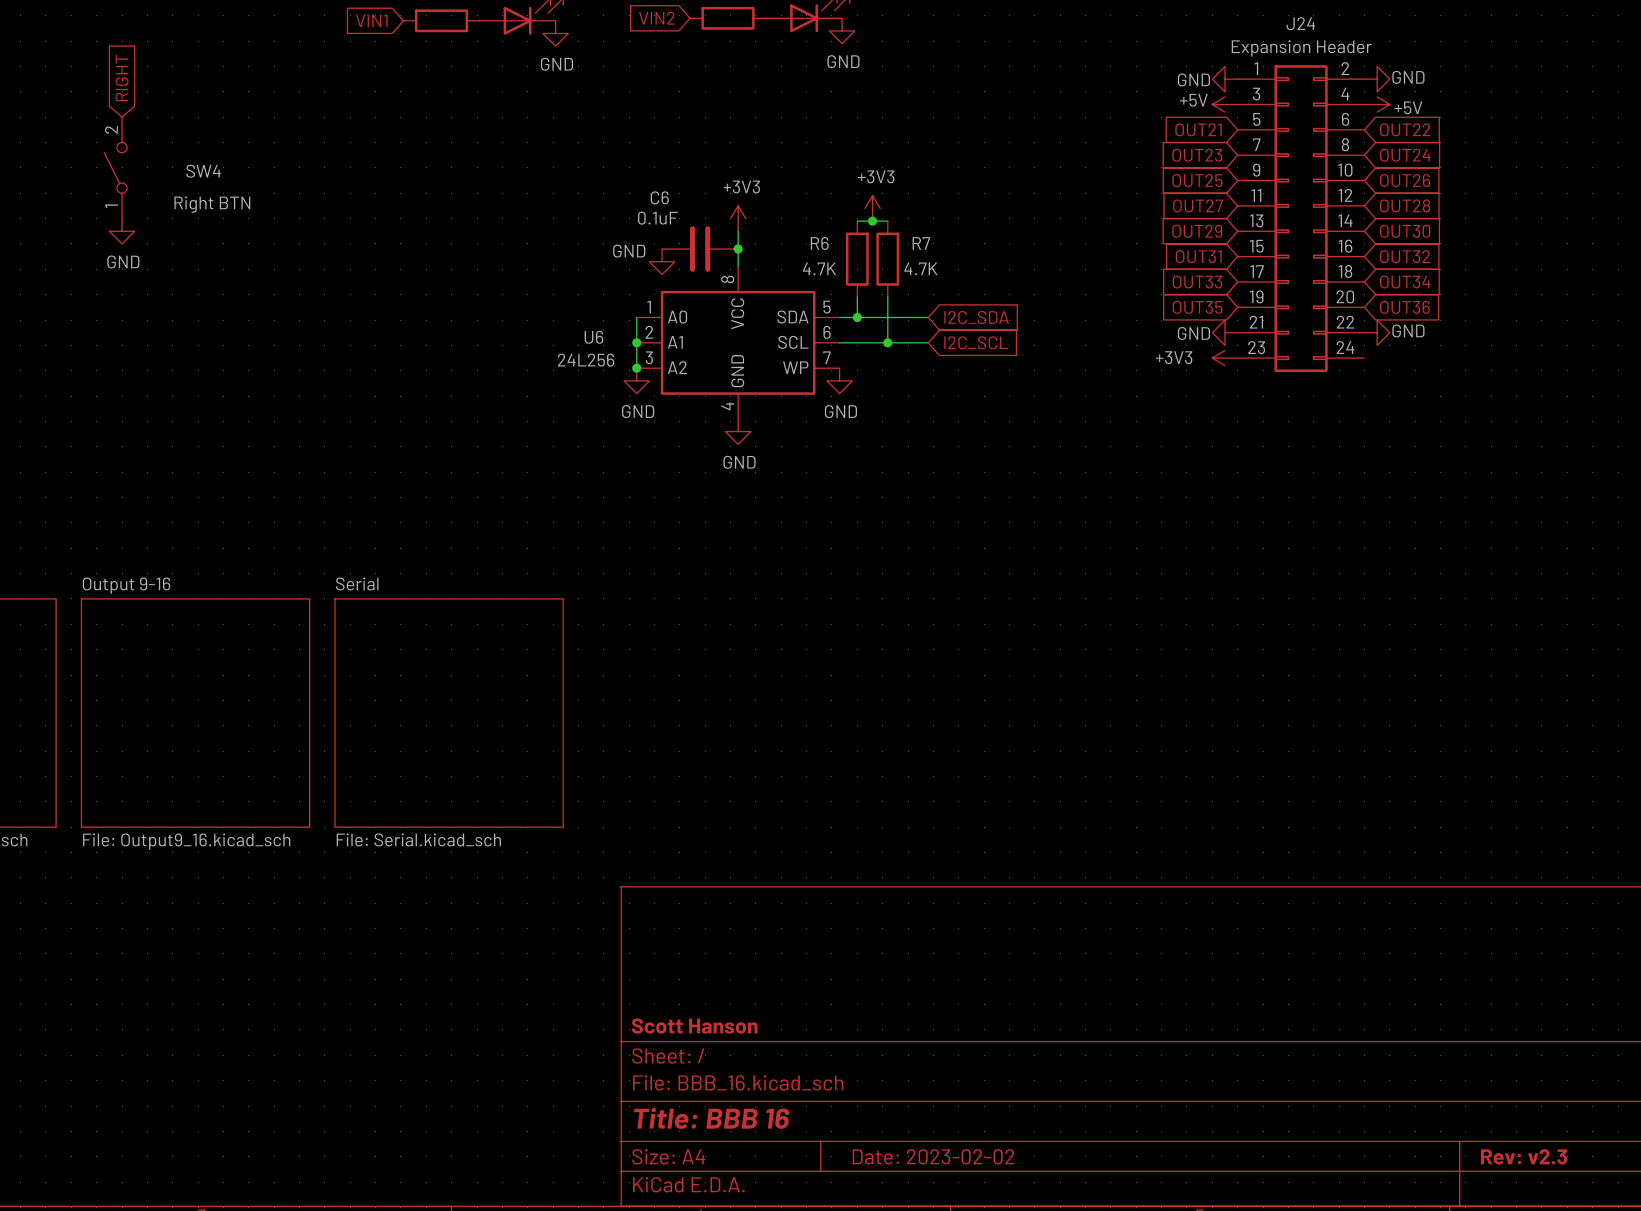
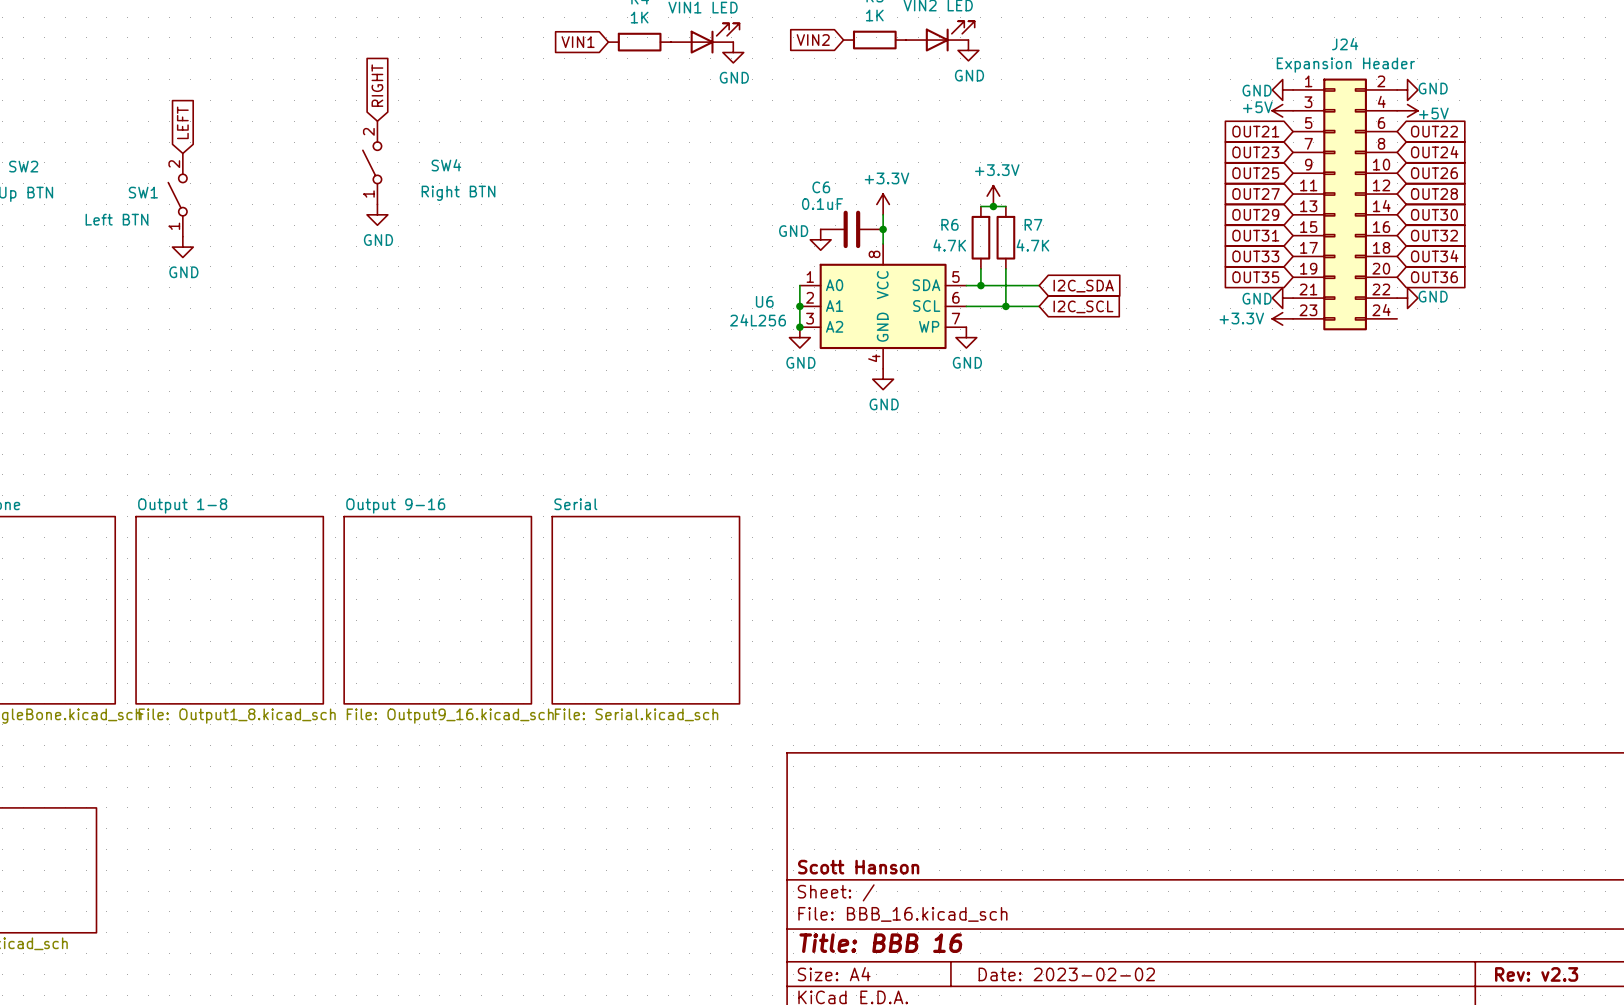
power symbol: +3V3 (872, 208) -> +3.3V (993, 196)
power symbol: +3V3 (738, 218) -> +3.3V (883, 204)
power symbol: +3V3 (1225, 358) -> +3.3V (1282, 318)

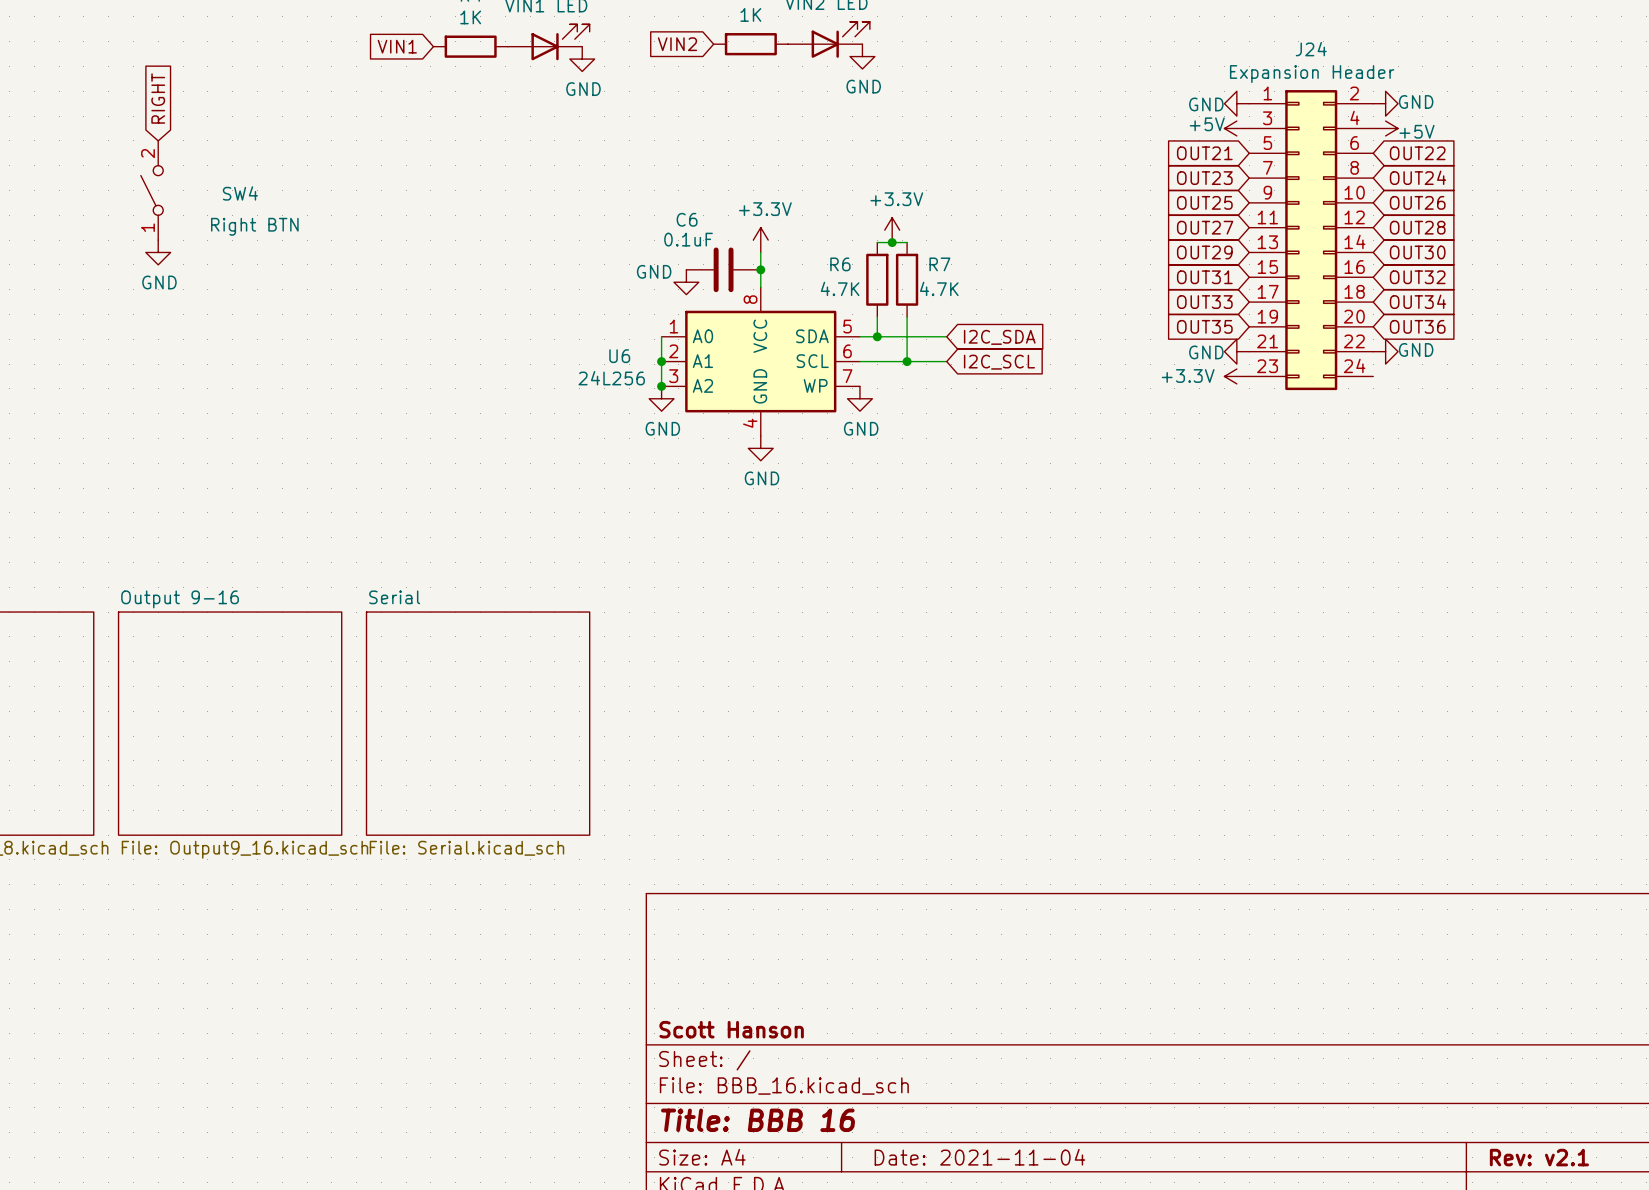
title block: Date: 2023-02-02 (1066, 974) -> Date: 2021-11-04 (979, 1157)
title block: Rev: v2.3 (1536, 974) -> Rev: v2.1 (1539, 1157)

